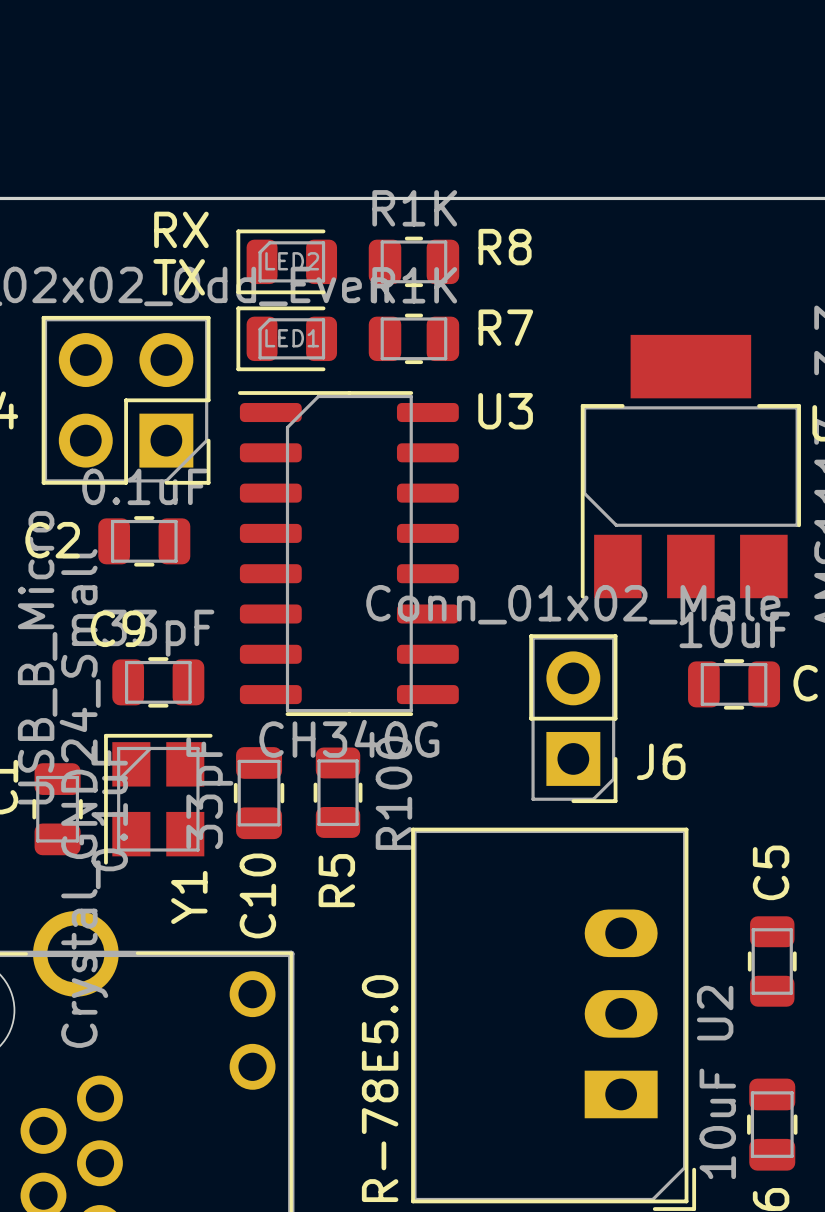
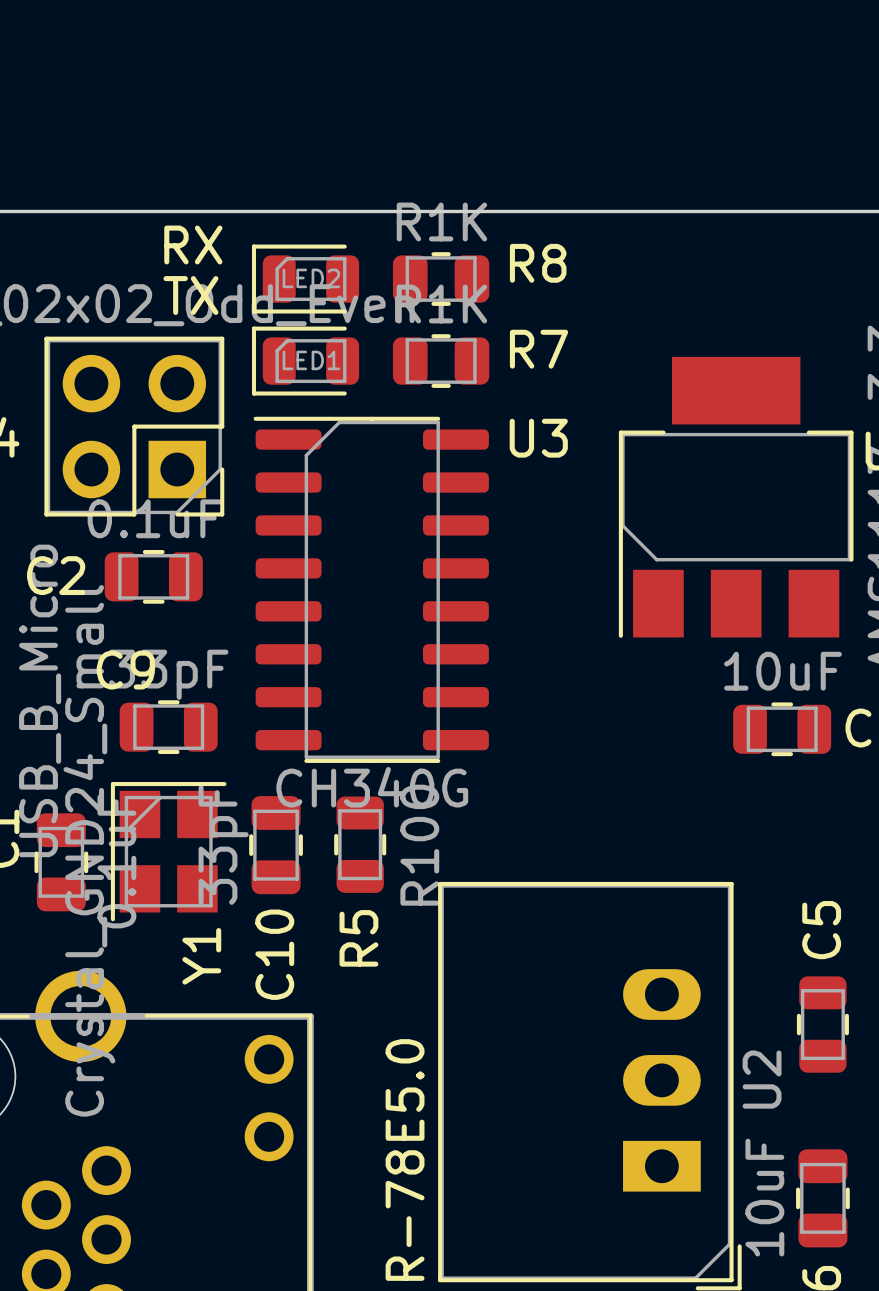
J6: Conn_01x02_Male (573, 718) -> none

